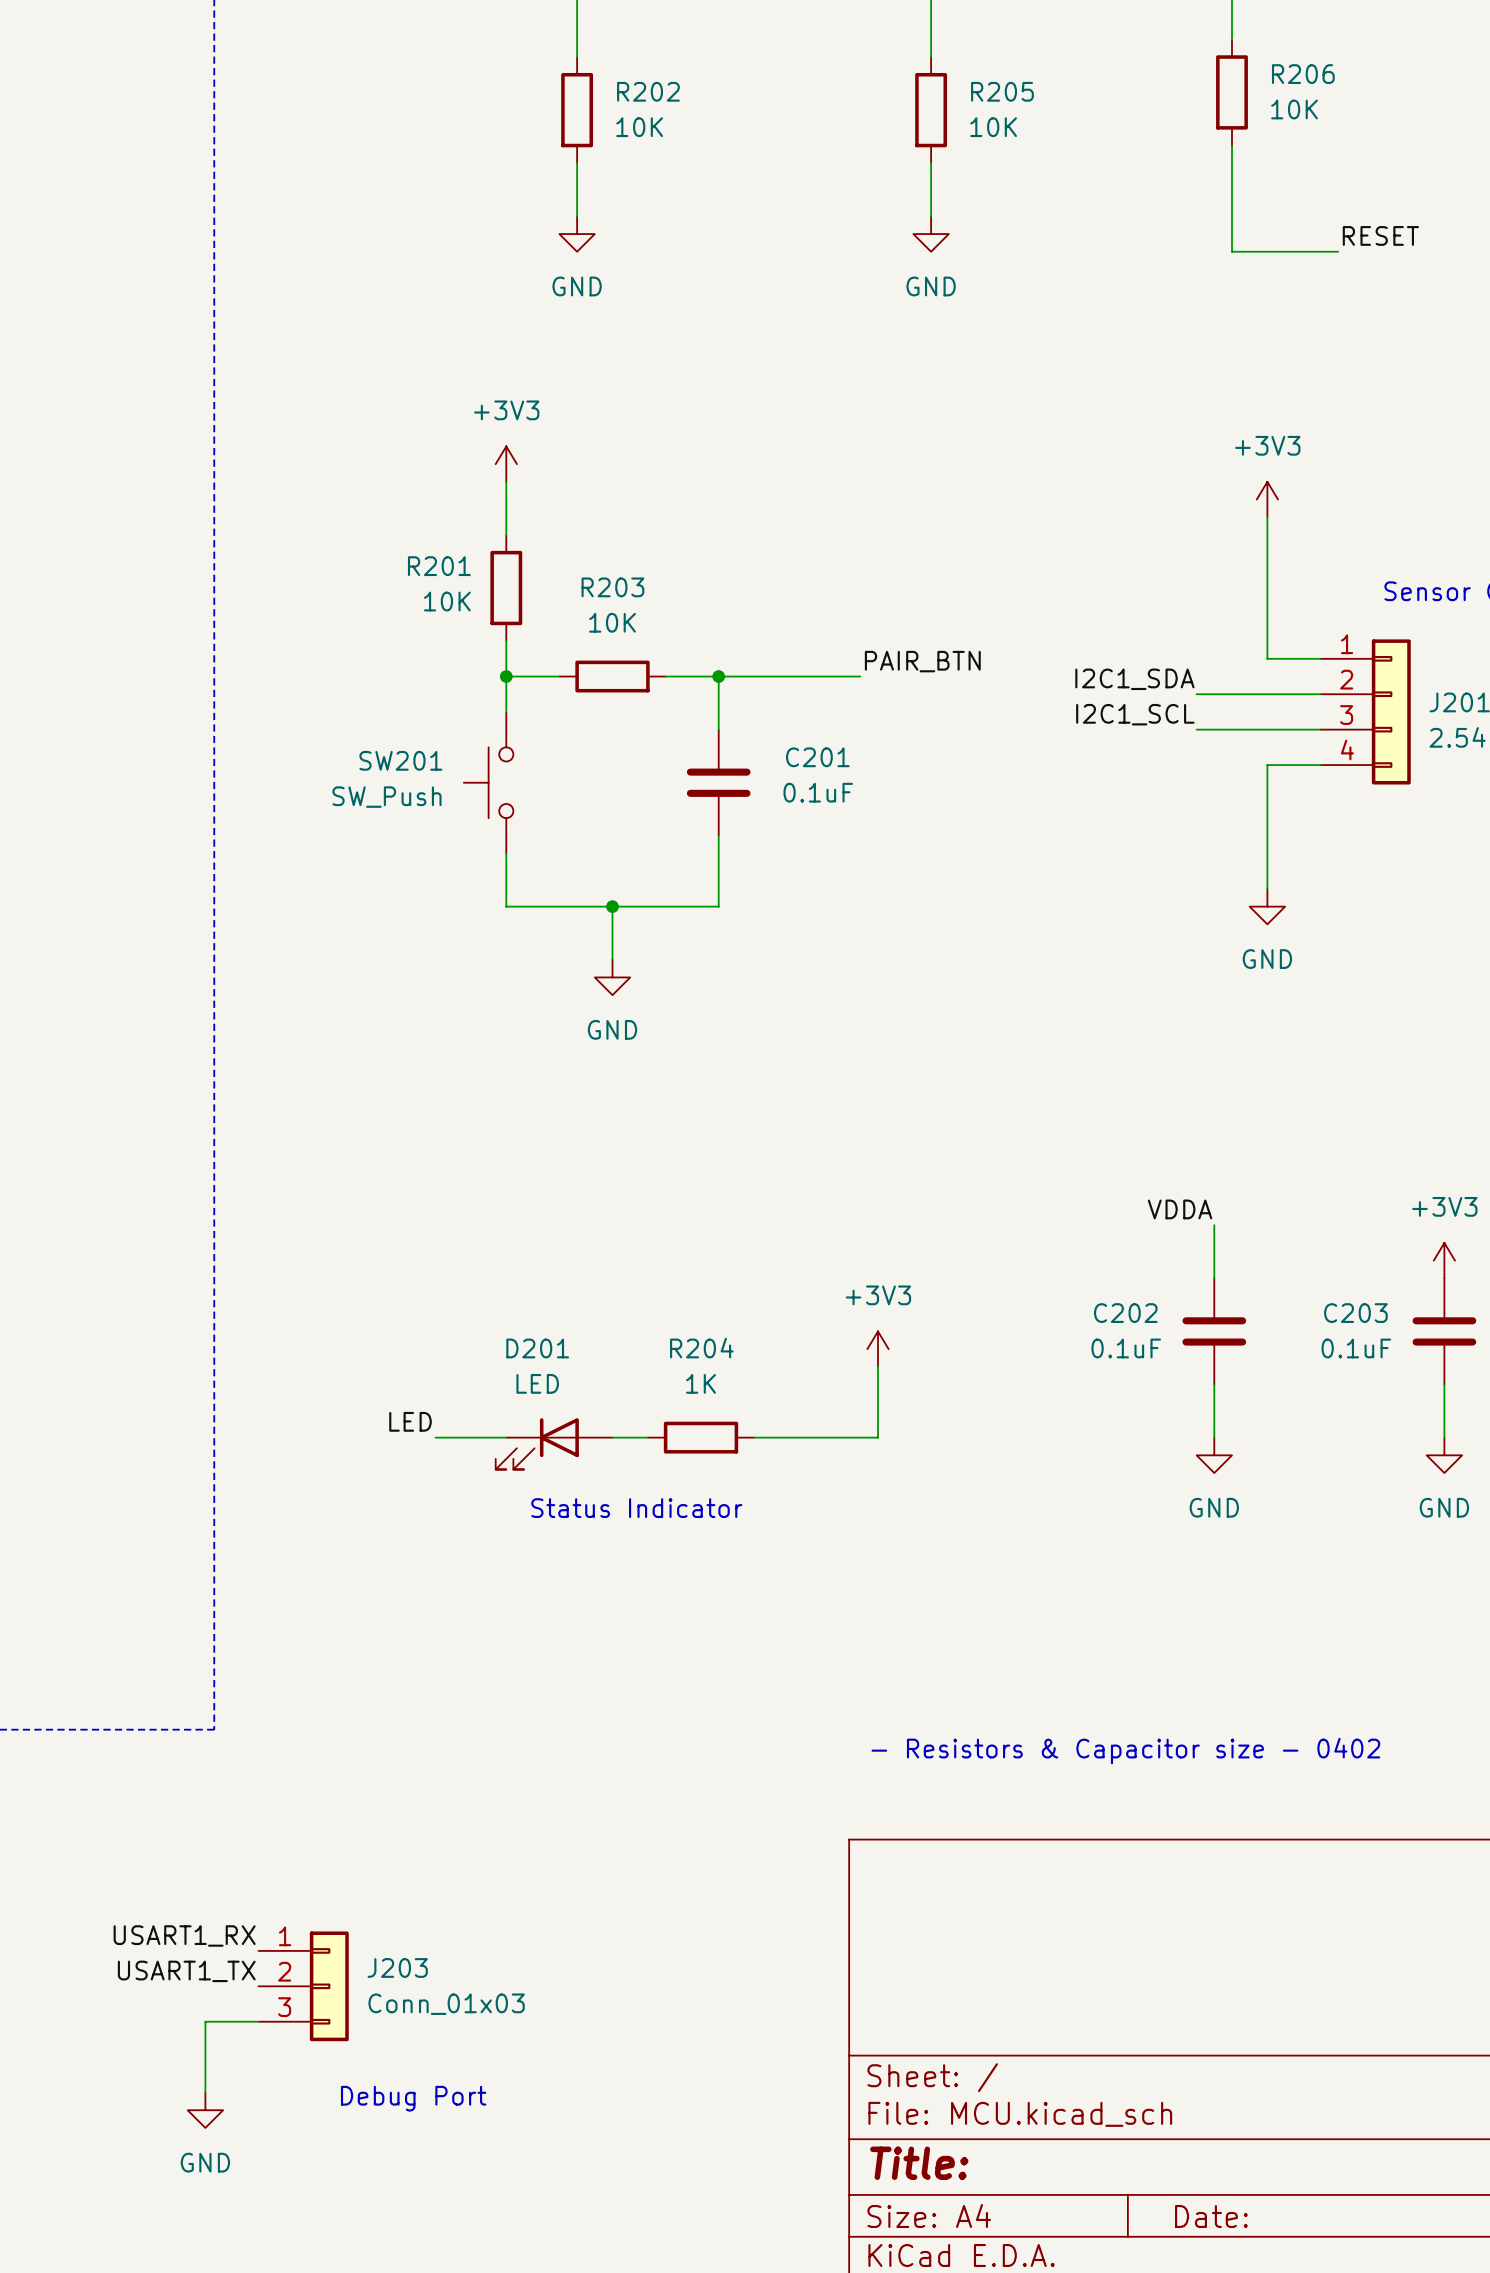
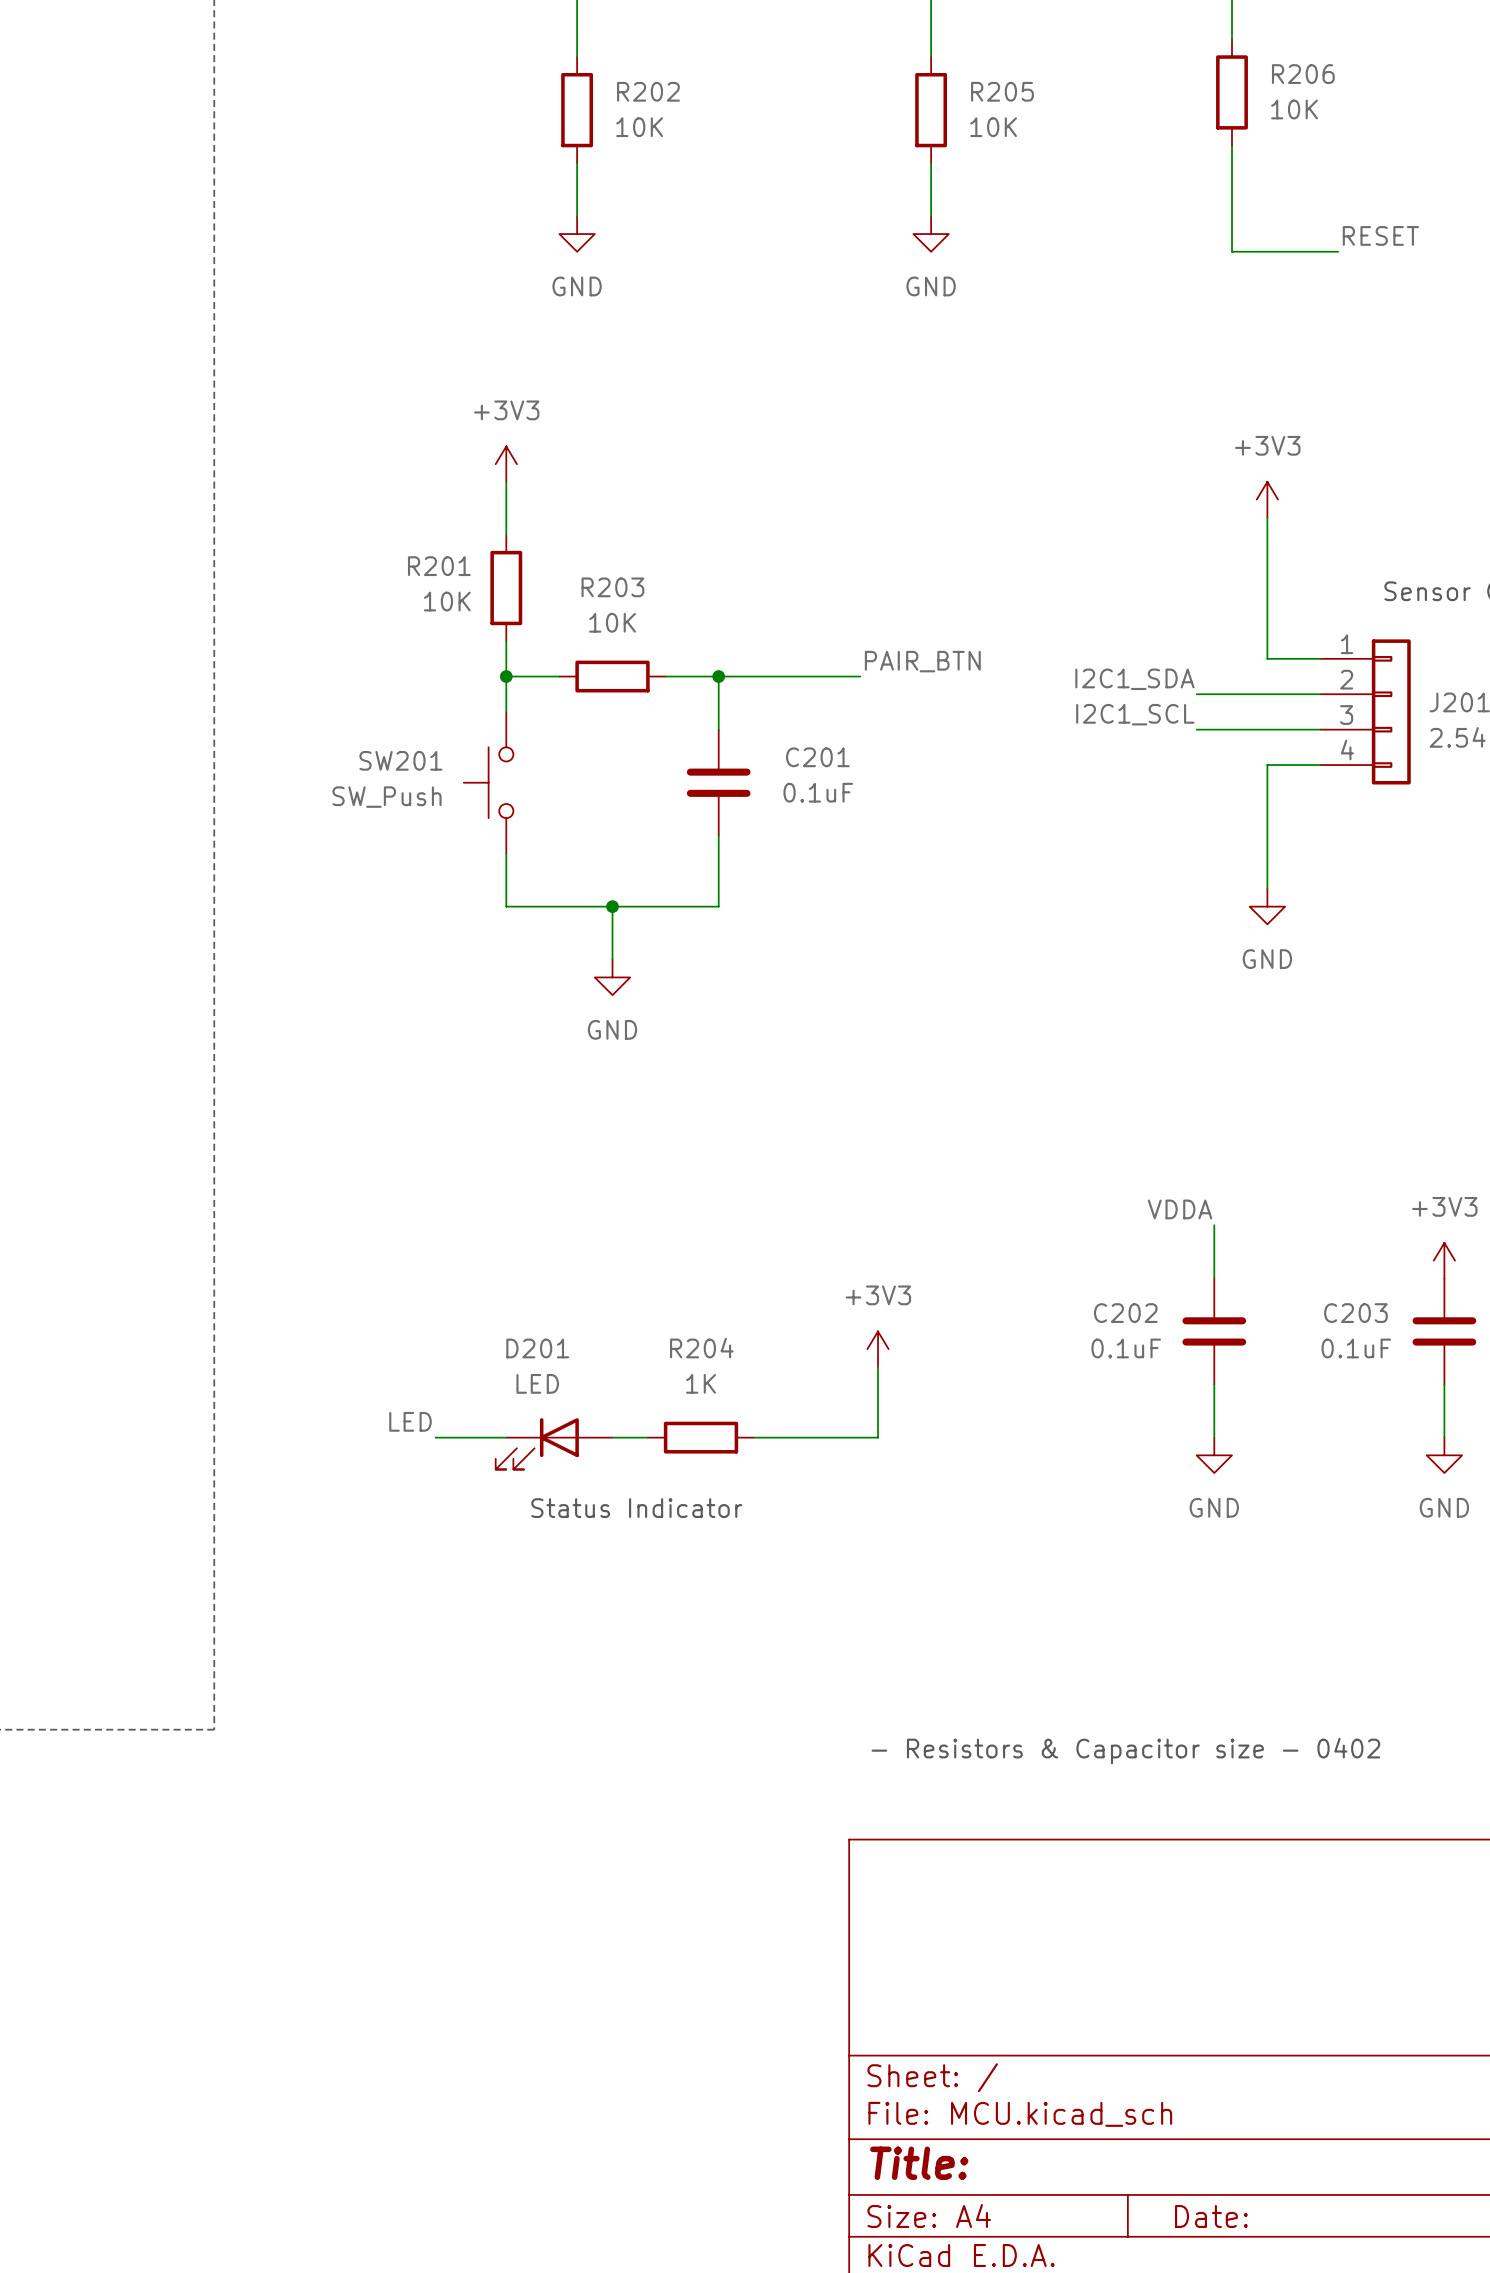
label: USART1_RX (184, 1935) -> none
label: USART1_TX (186, 1971) -> none
J203: Conn_01x03 (303, 1986) -> none
wire: (258, 2021) (205, 2021) (205, 2092) -> none
text: Debug Port (413, 2098) -> none
power symbol: GND (205, 2110) -> none

